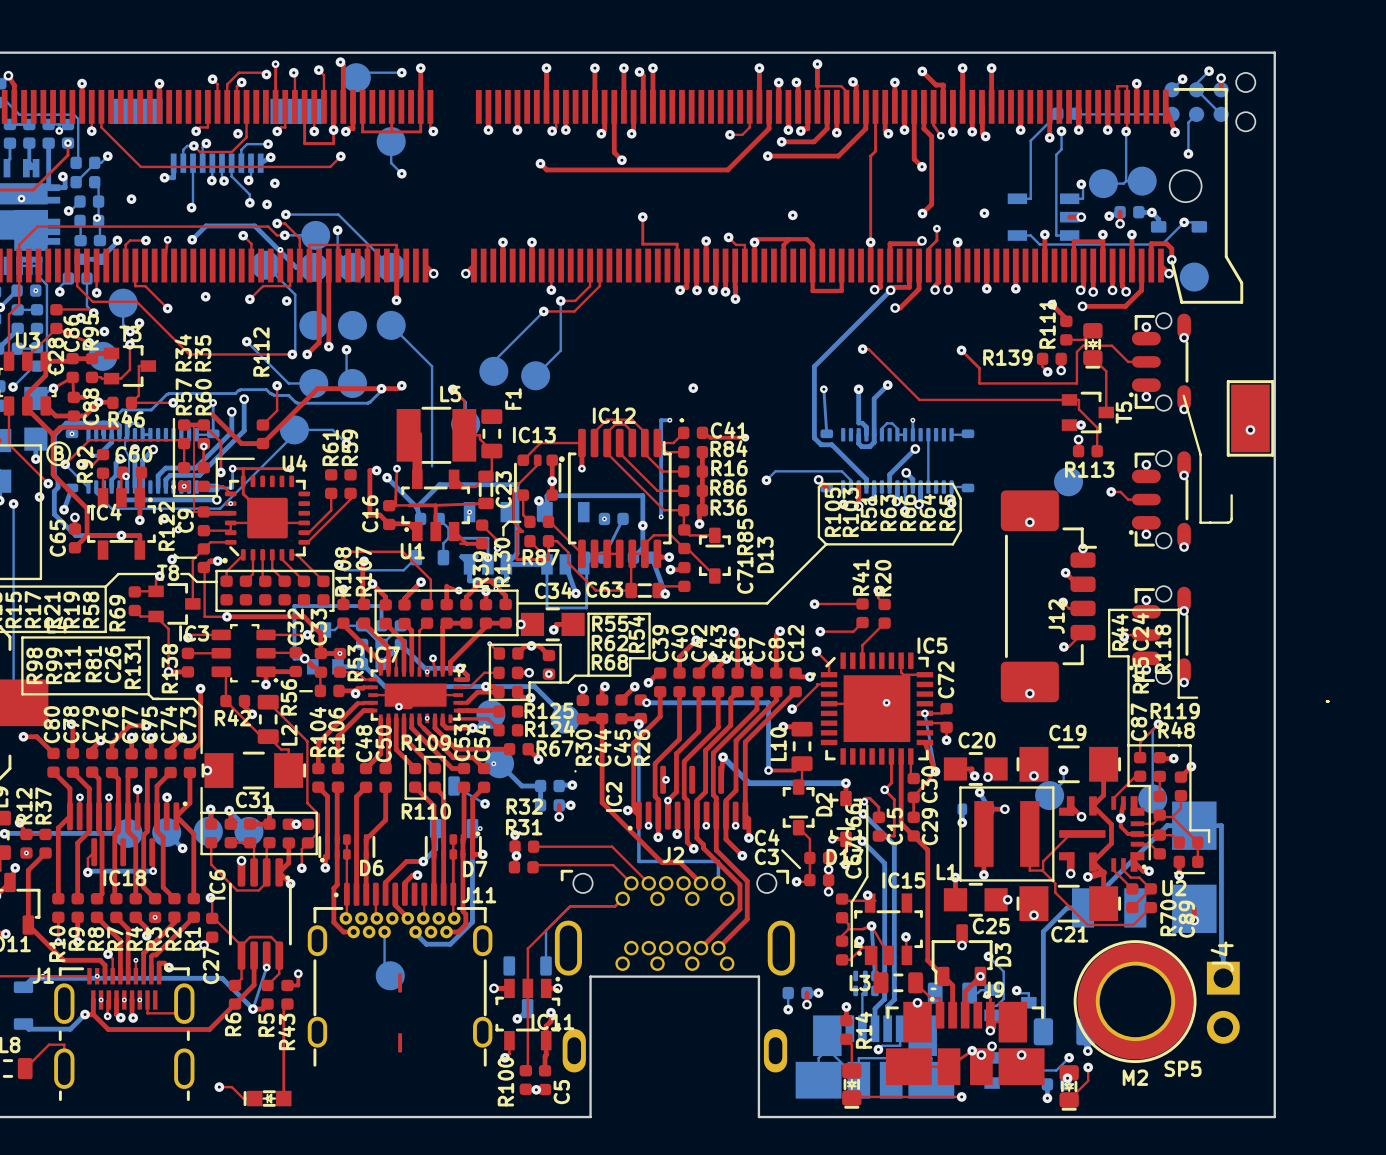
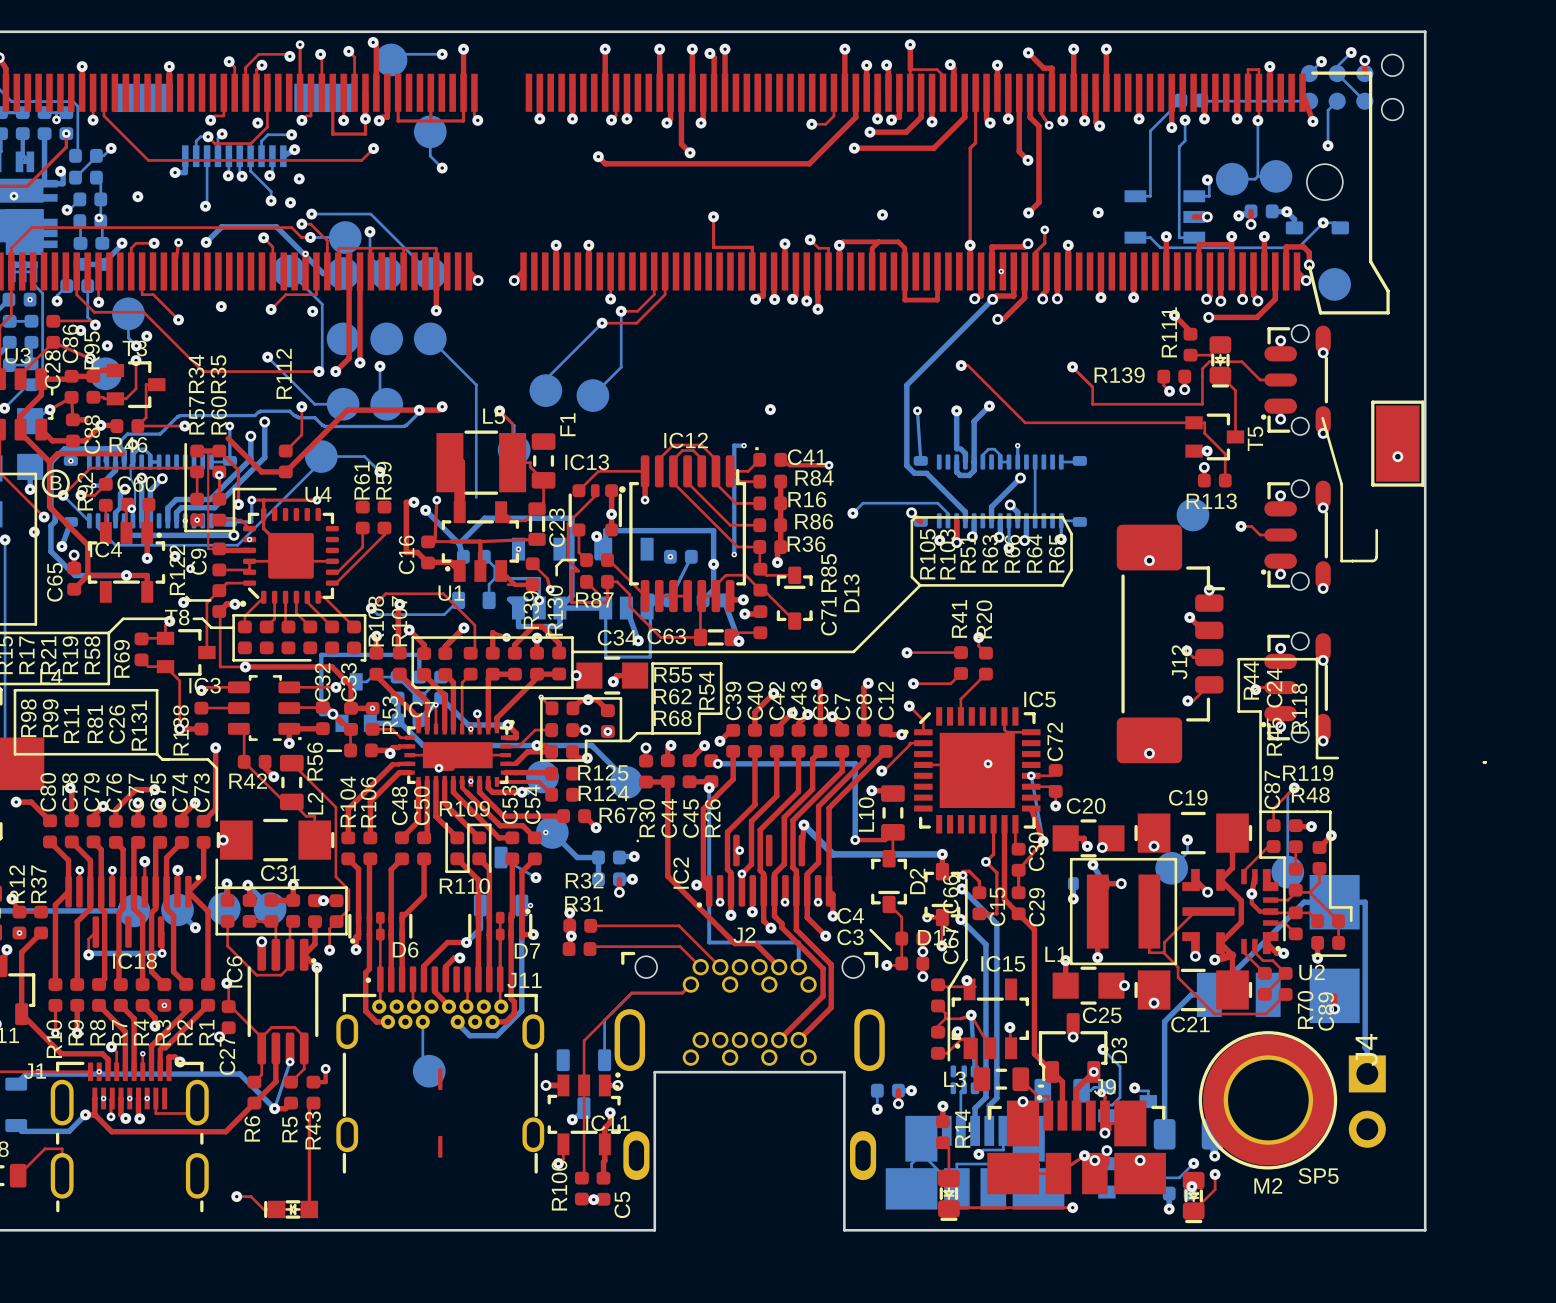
via: none -> (1001, 271)

